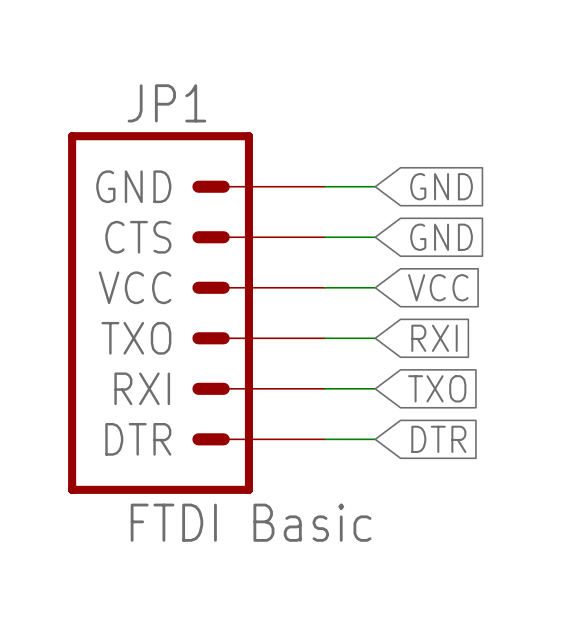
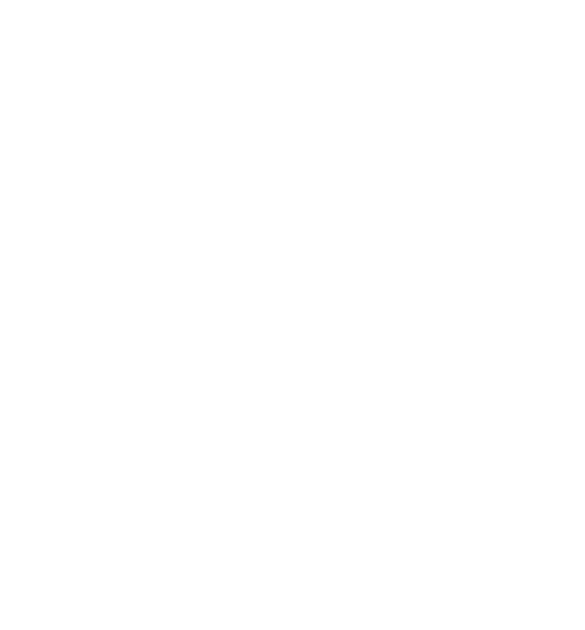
wire: (324, 186) (375, 186) -> none
global label: GND (441, 186) -> none
wire: (324, 237) (375, 237) -> none
global label: GND (441, 237) -> none
wire: (324, 287) (375, 287) -> none
global label: VCC (438, 287) -> none
JP1: FTDI Basic (196, 313) -> none
wire: (324, 338) (375, 338) -> none
global label: RXI (434, 338) -> none
wire: (324, 388) (375, 388) -> none
global label: TXO (437, 388) -> none
wire: (324, 439) (375, 439) -> none
global label: DTR (438, 439) -> none

